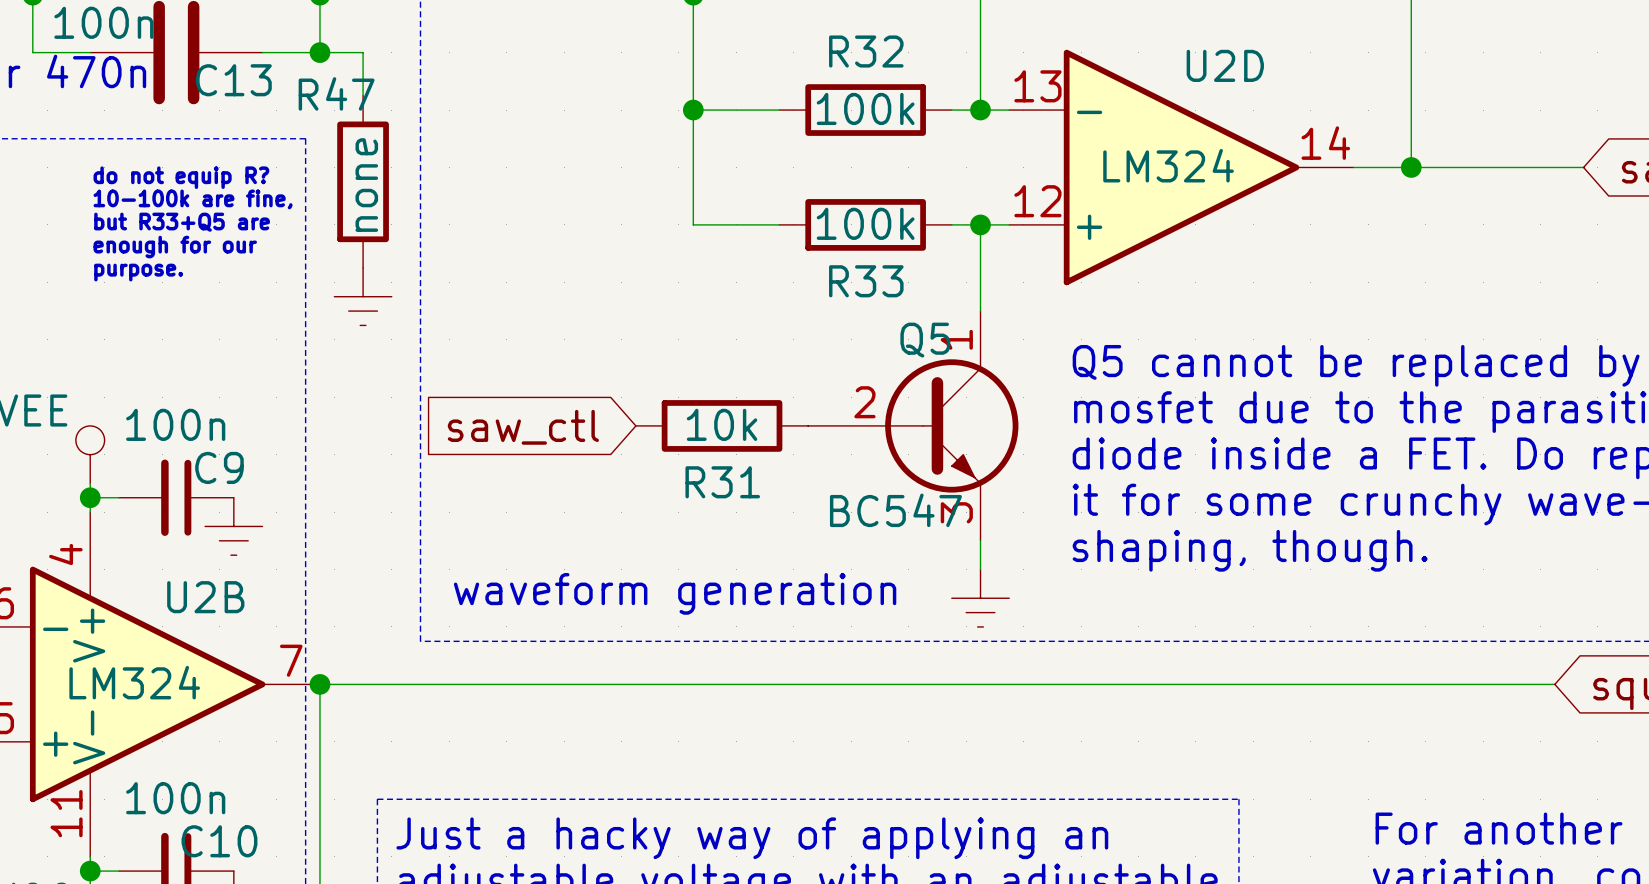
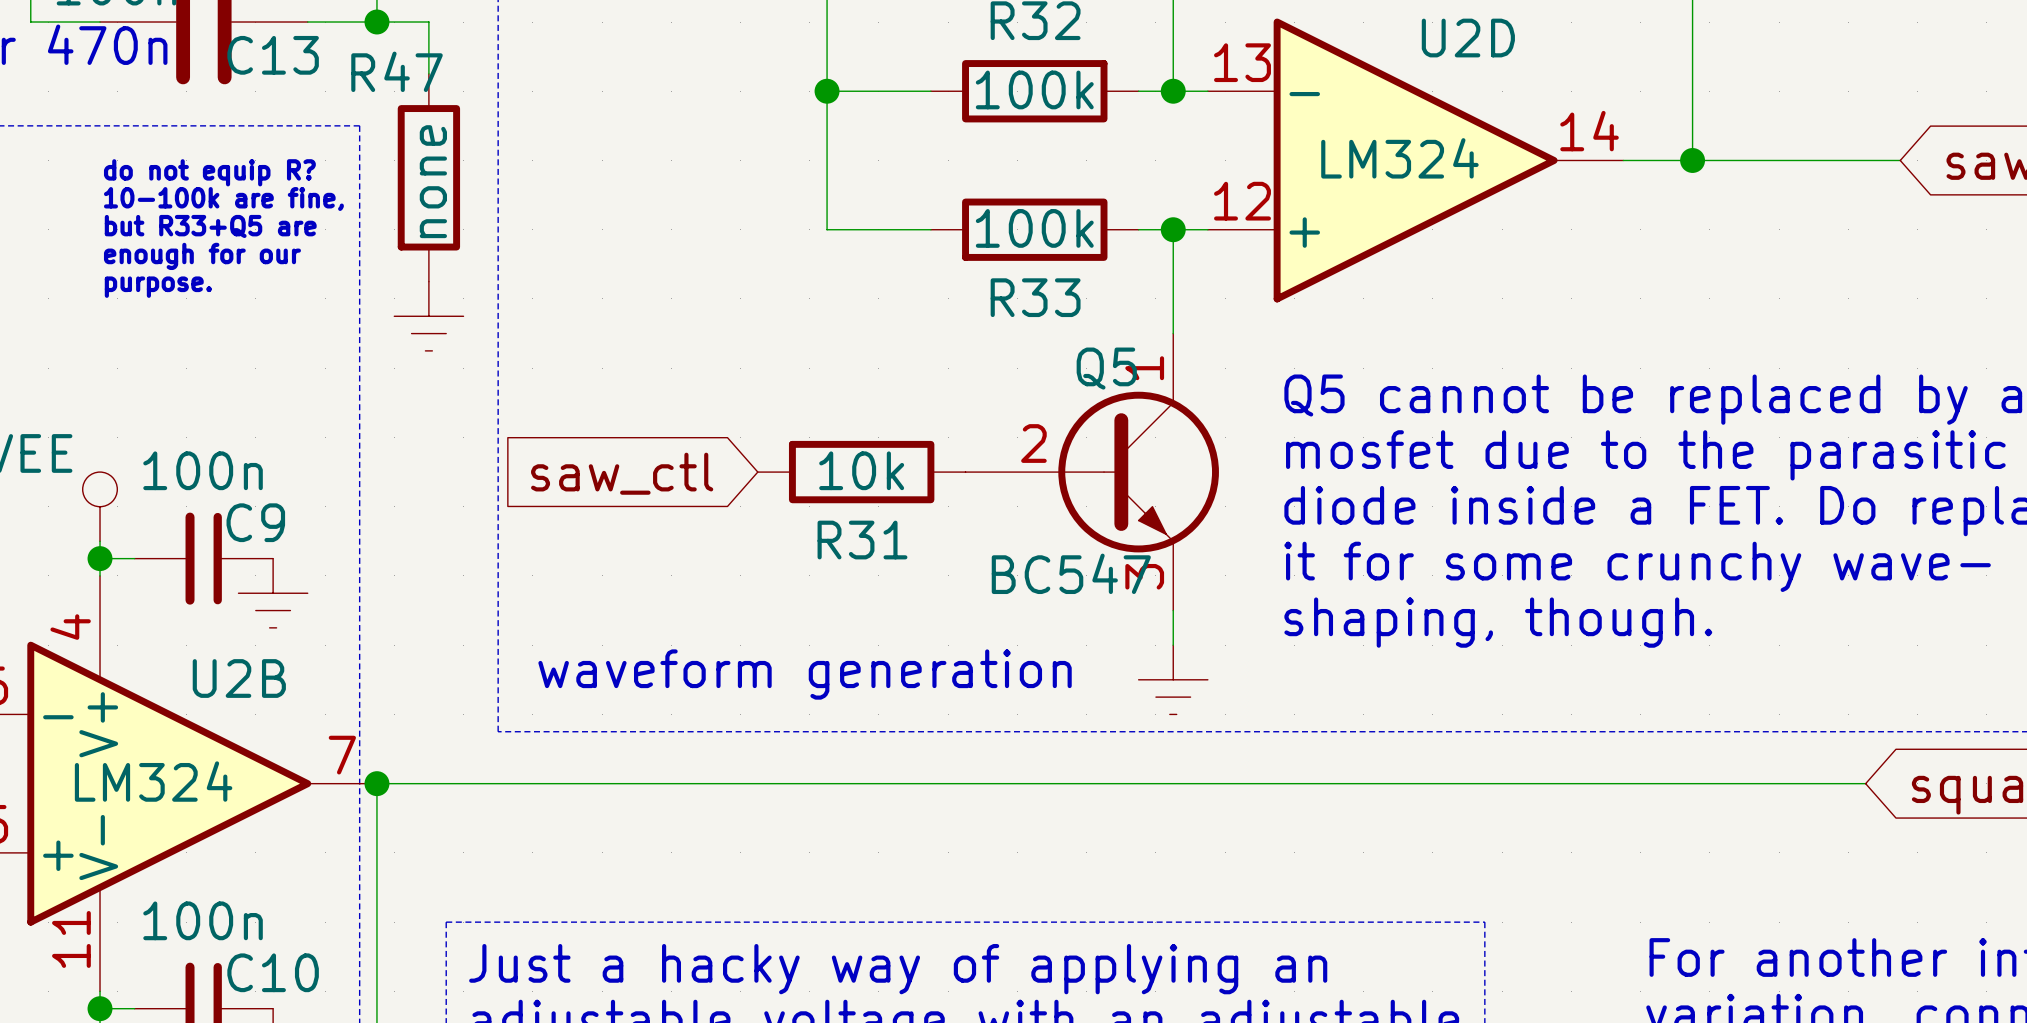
C10 name position: C10 (219, 841) -> C10 (273, 972)

